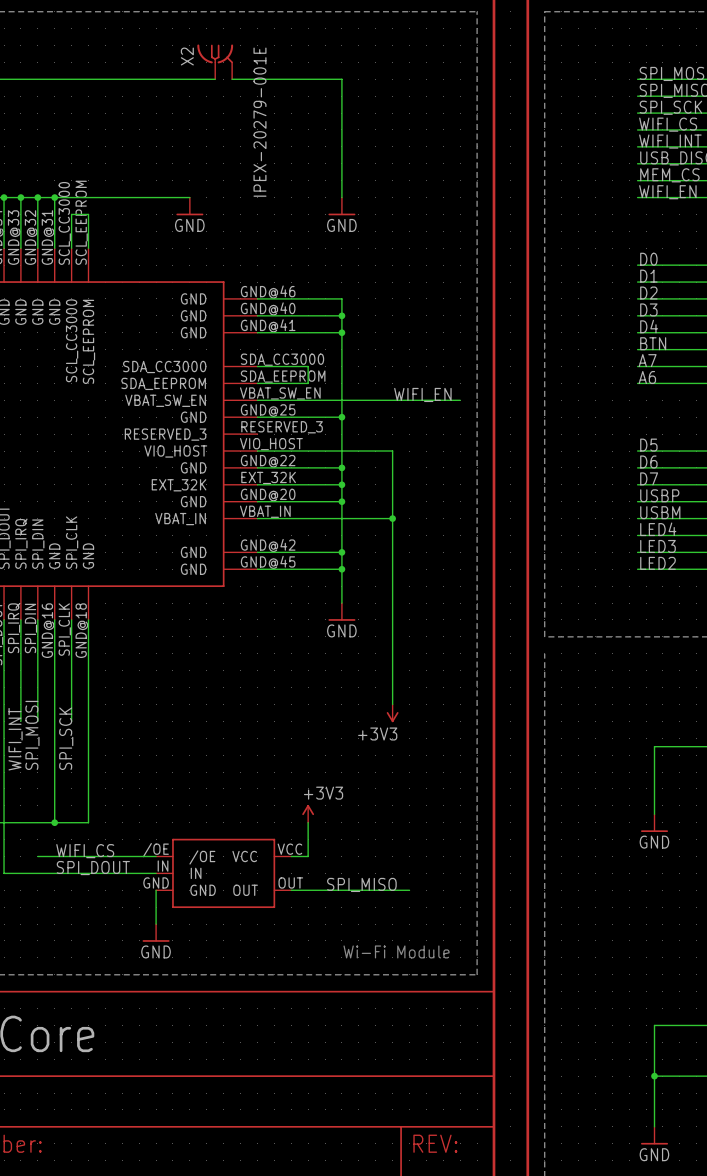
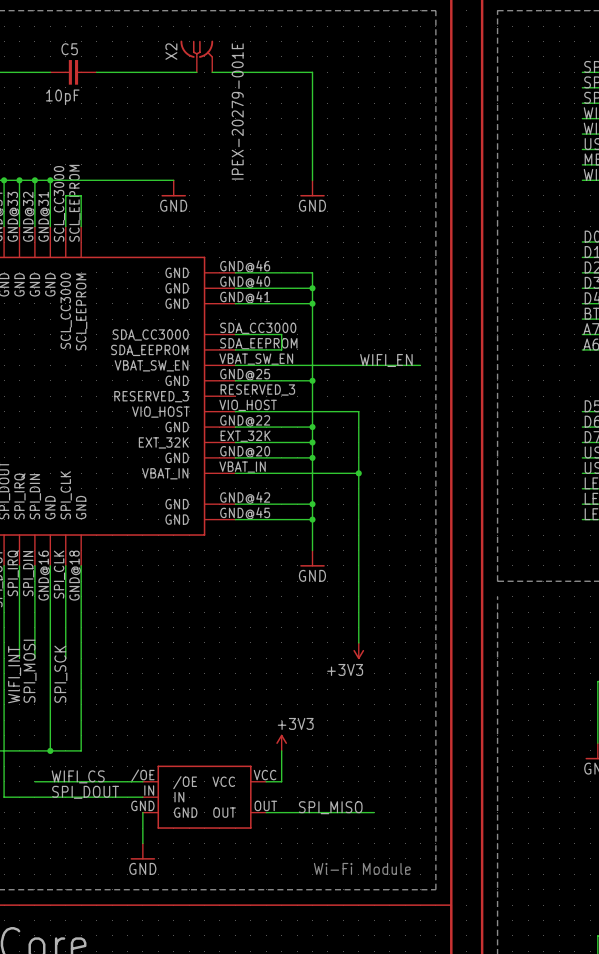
C5: none -> 10pF (73, 72)

